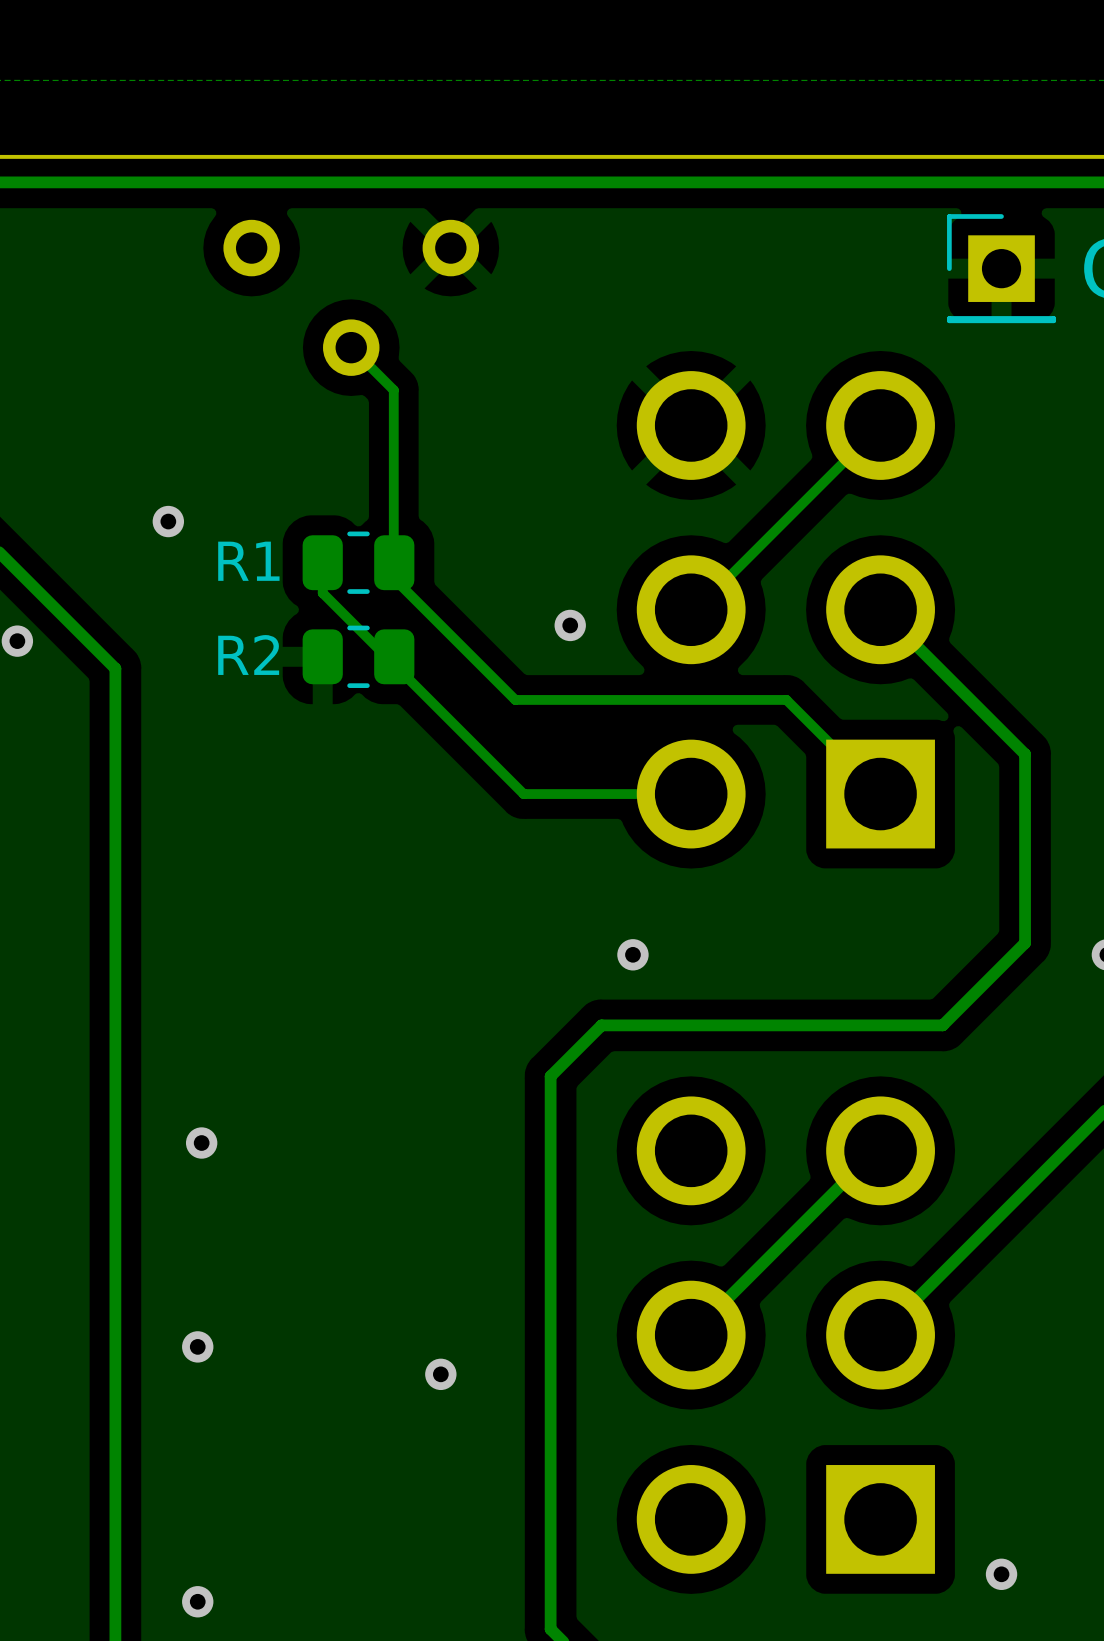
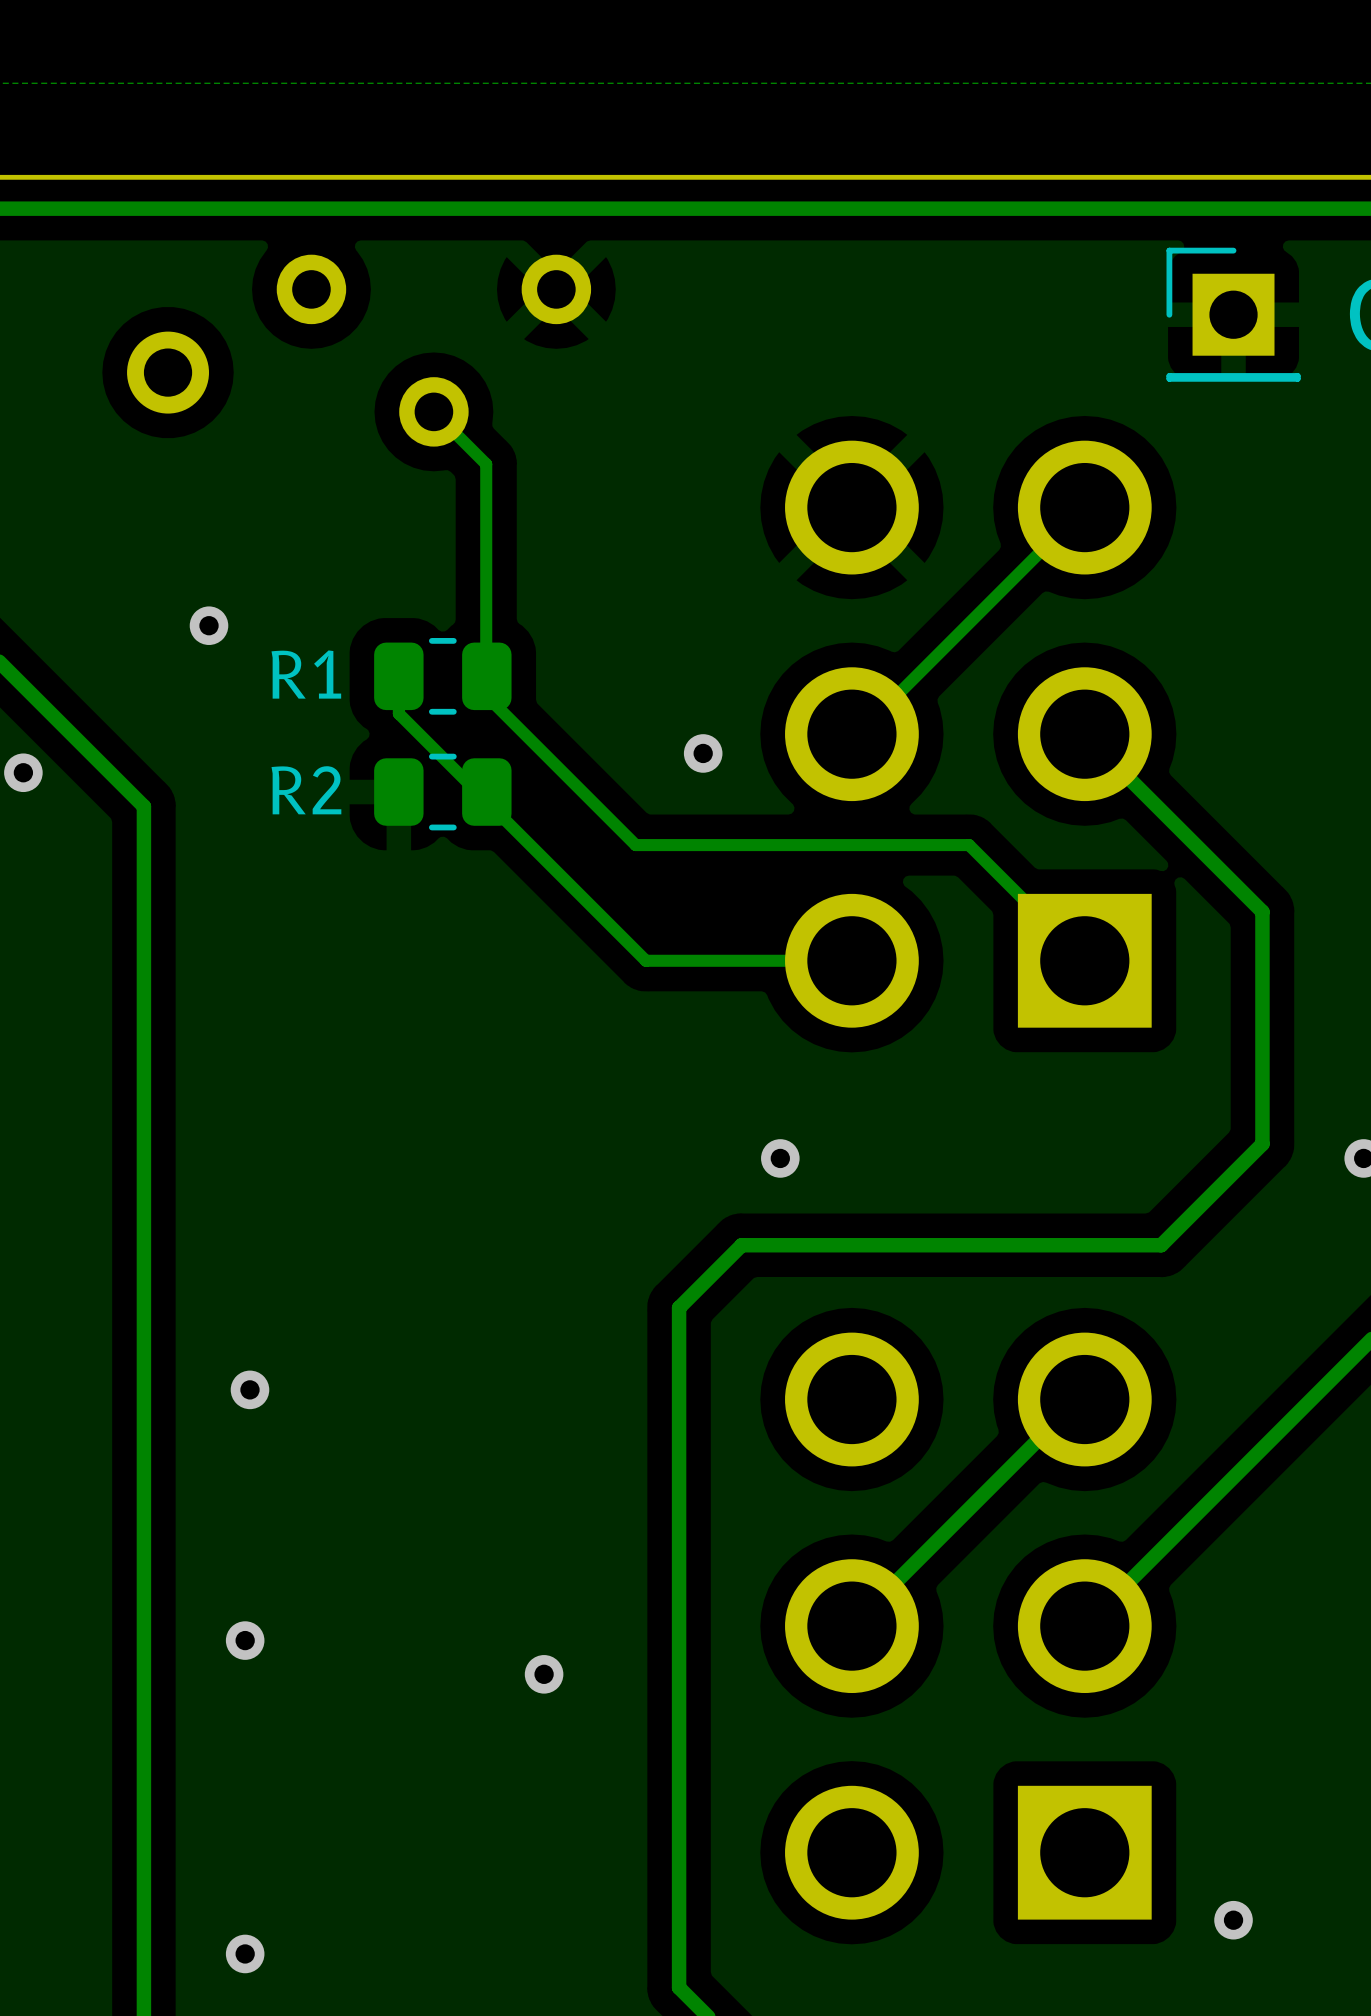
part: none -> (168, 372)

